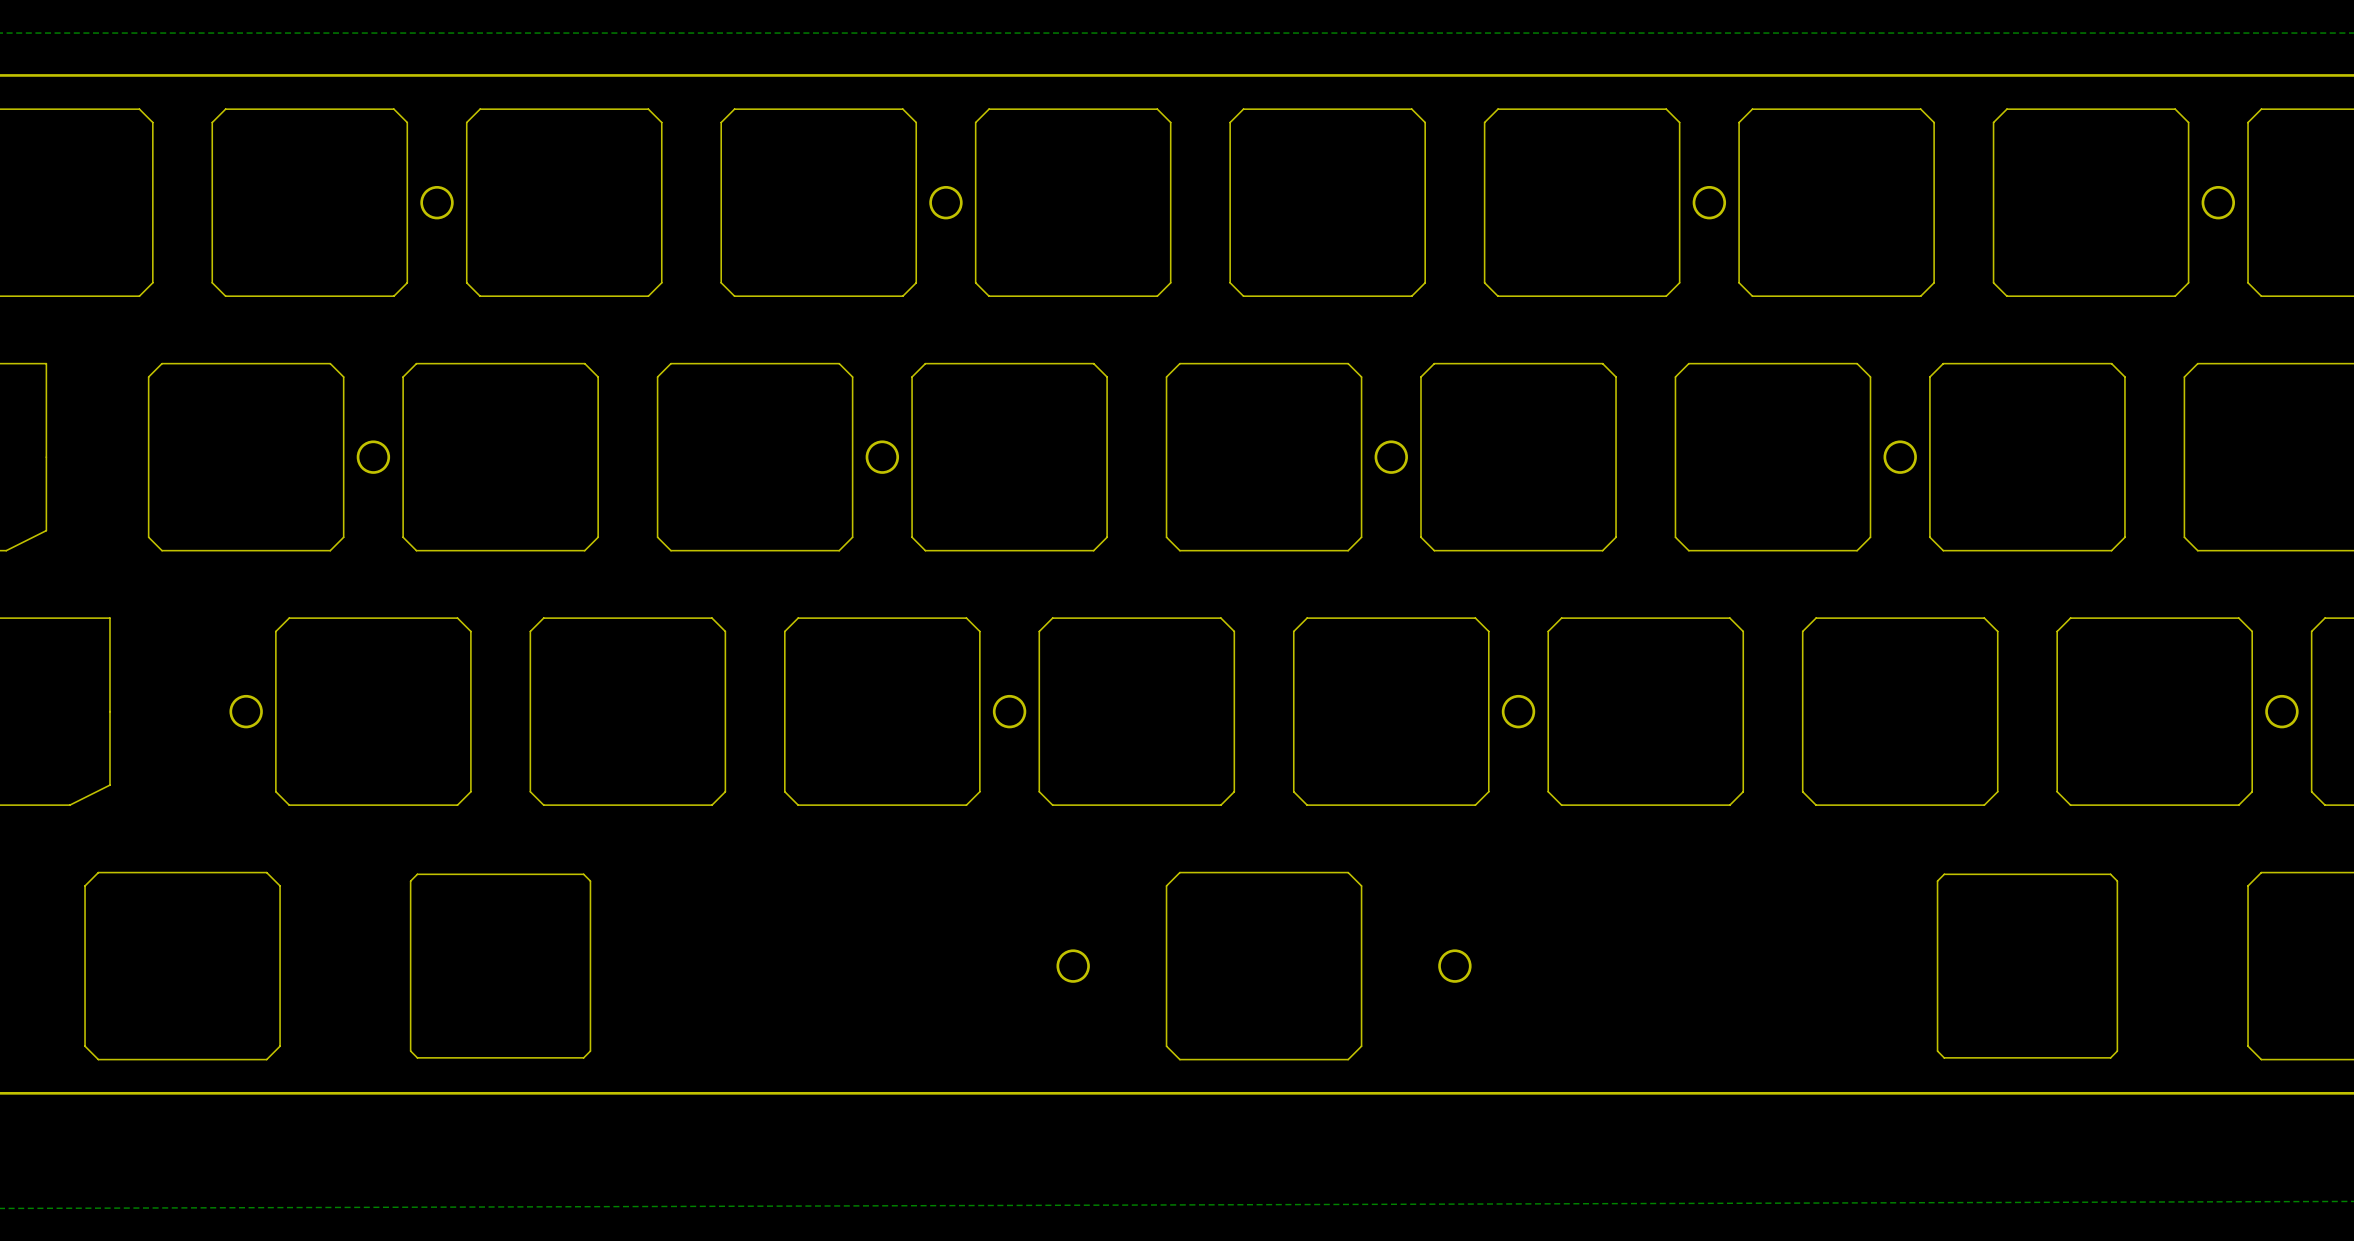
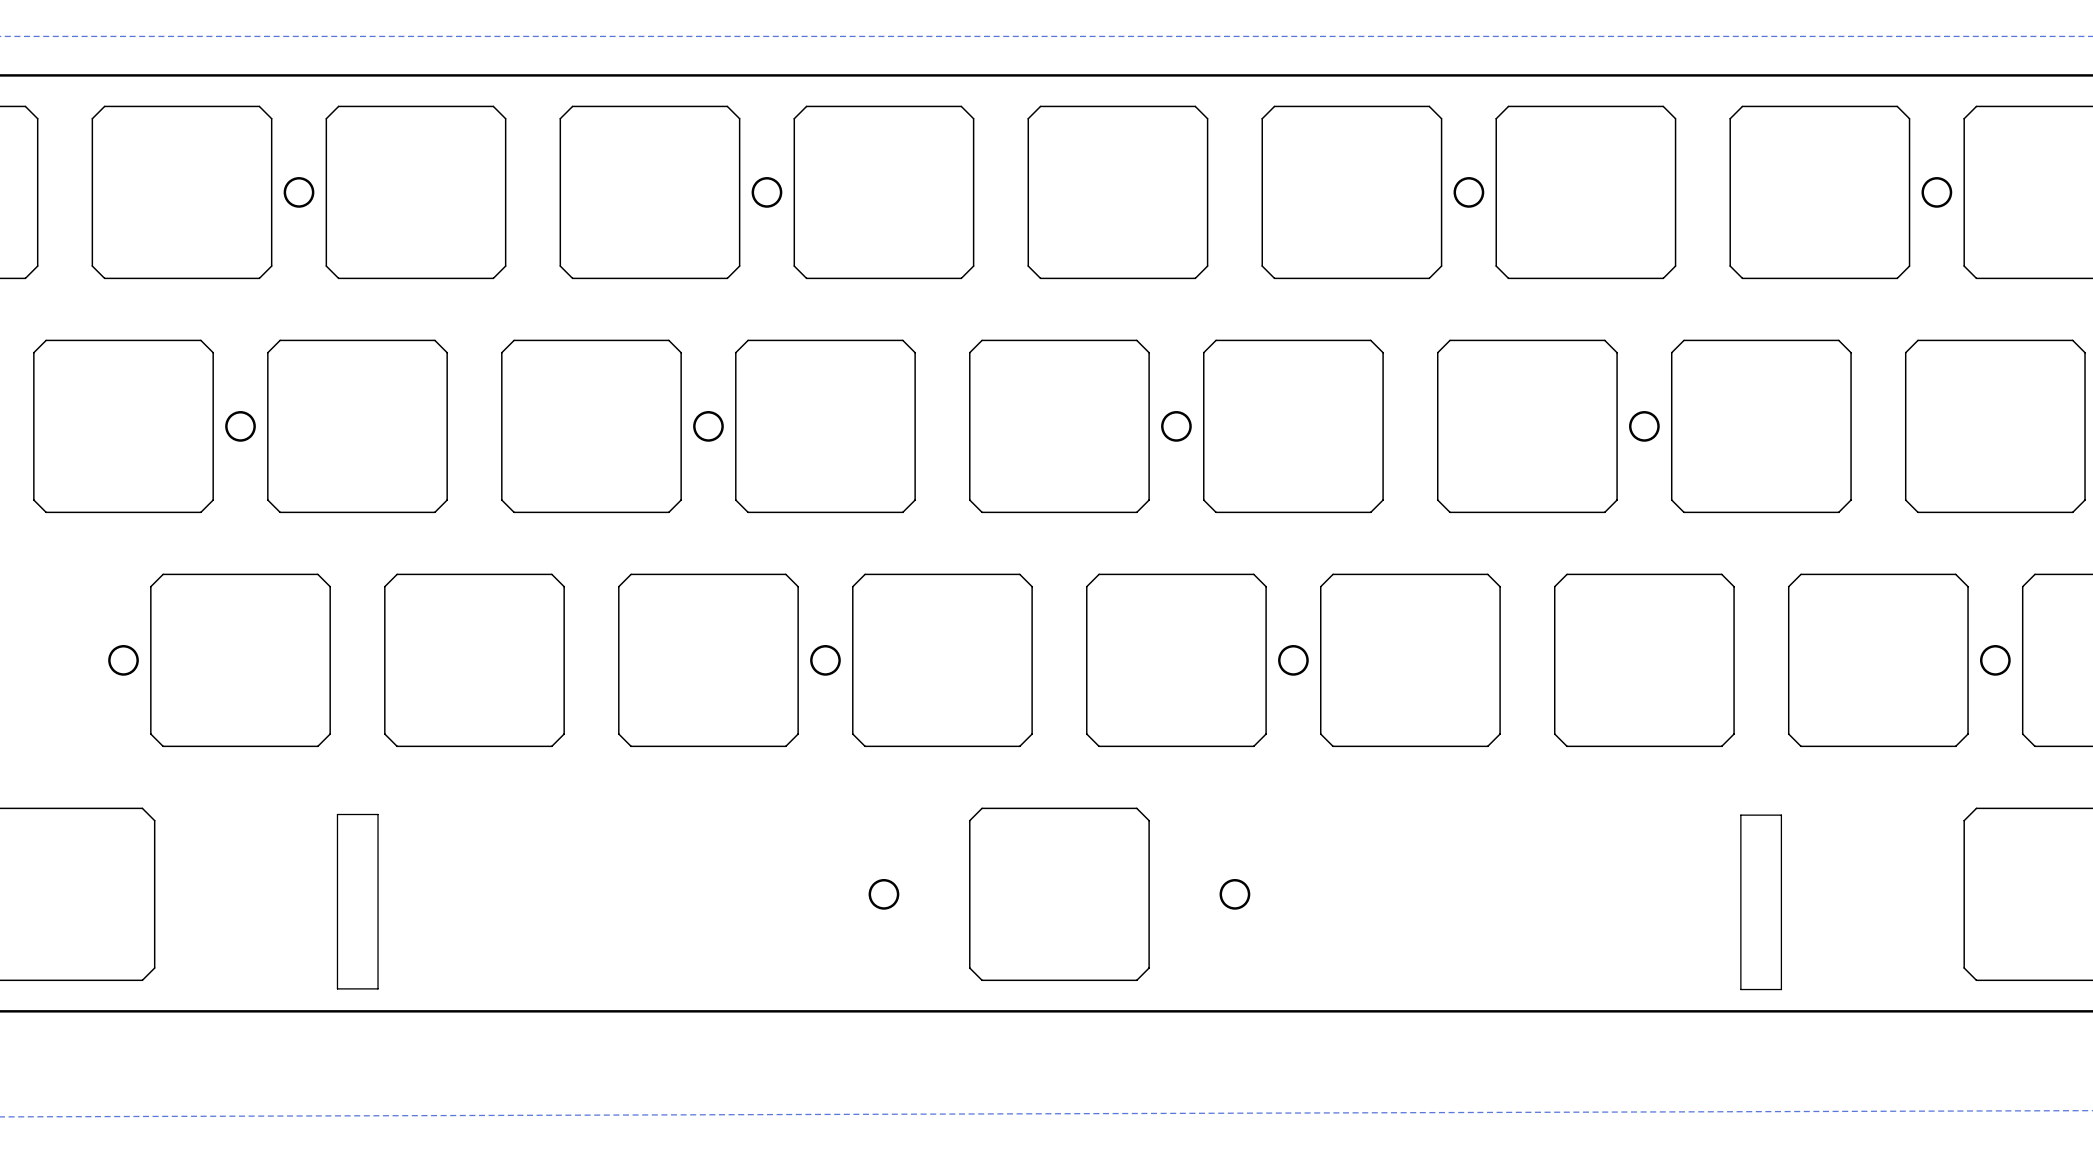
drawing shape: [409, 873, 2119, 1059] -> [337, 814, 1782, 990]

